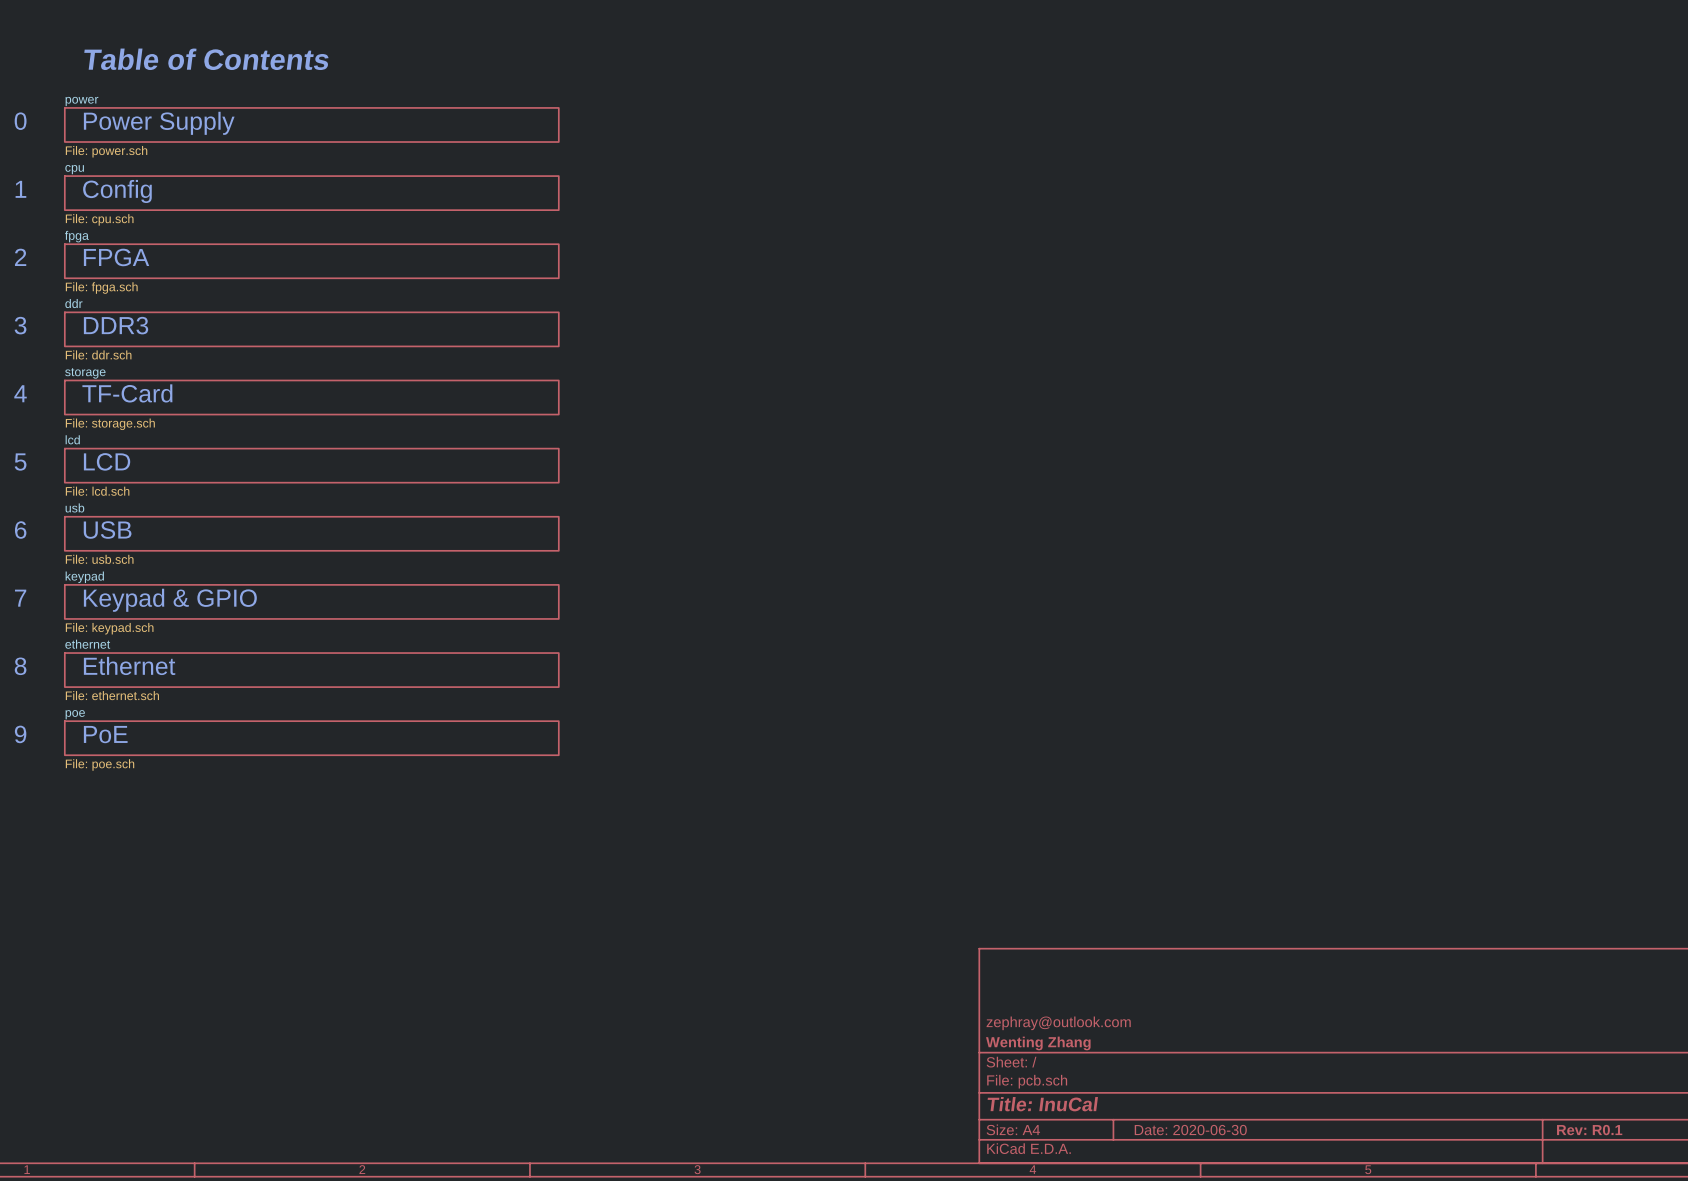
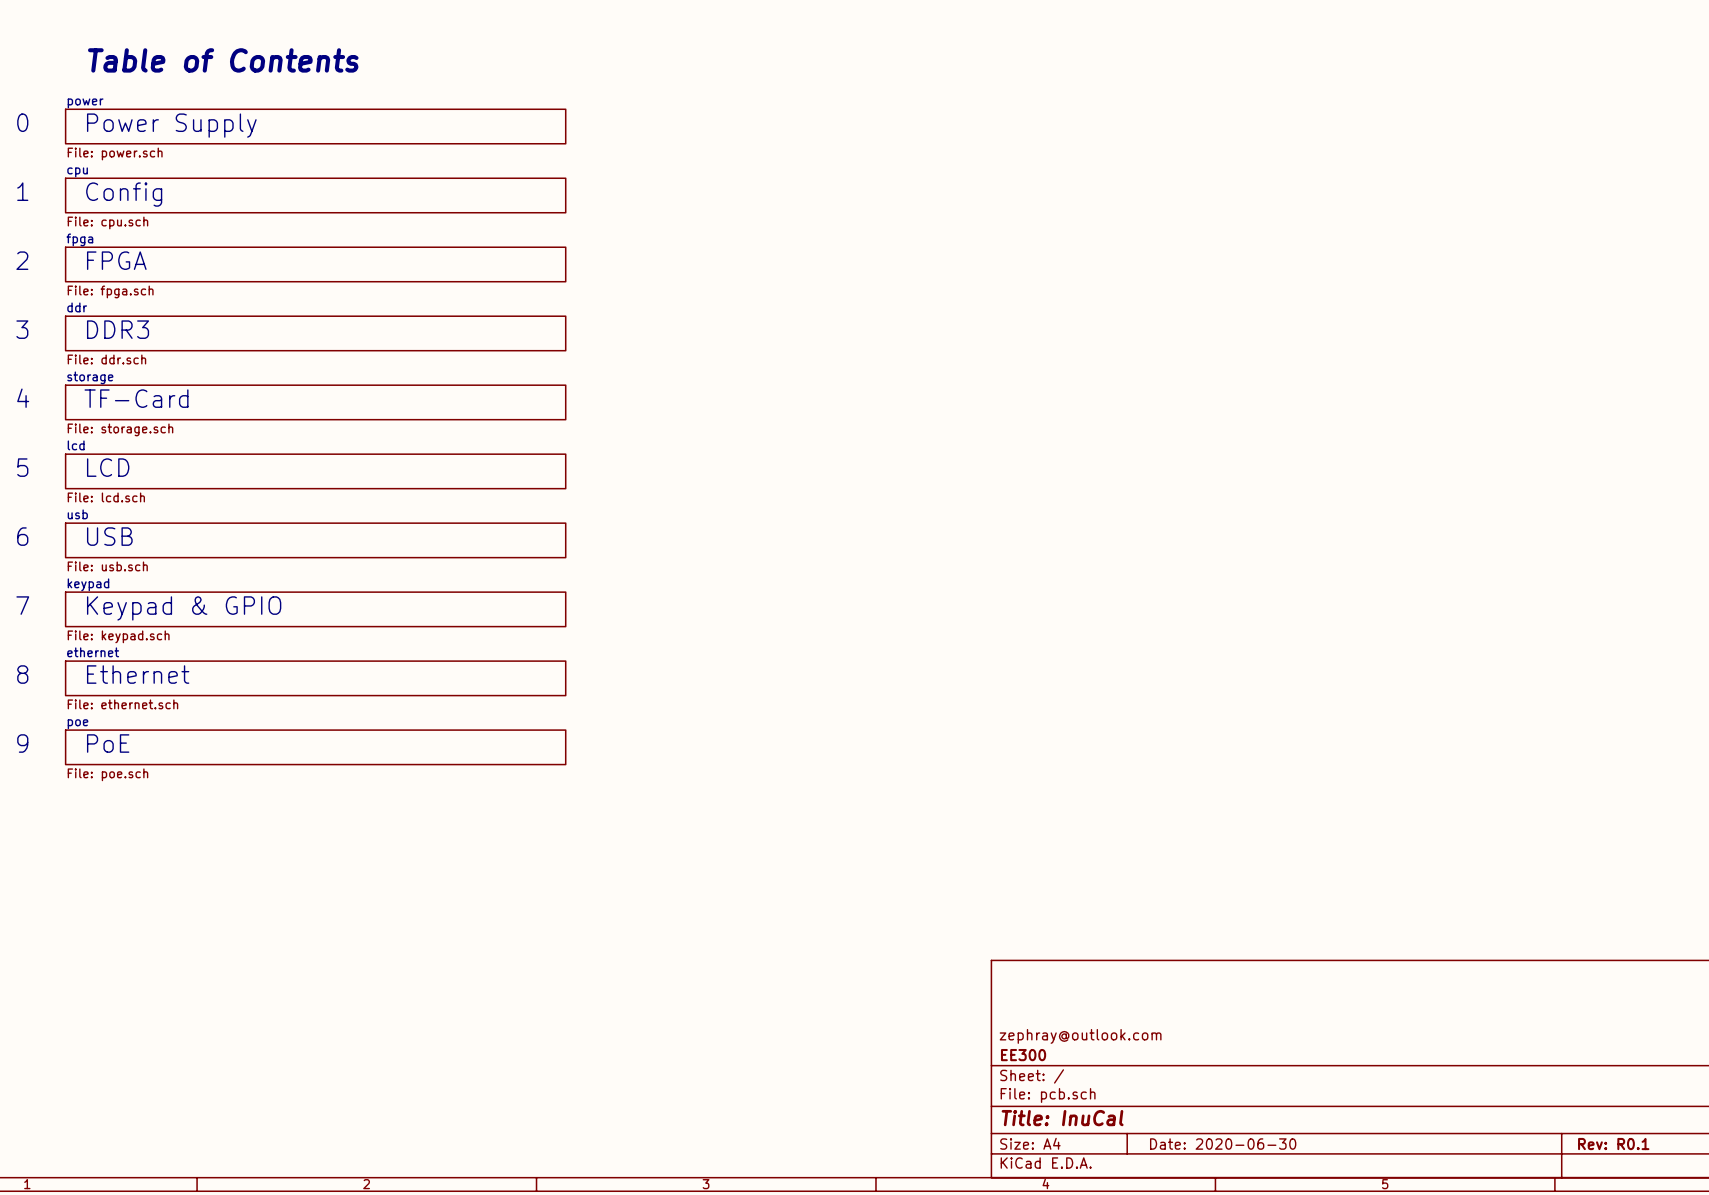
title block: Wenting Zhang (1038, 1043) -> EE300 (1023, 1055)

